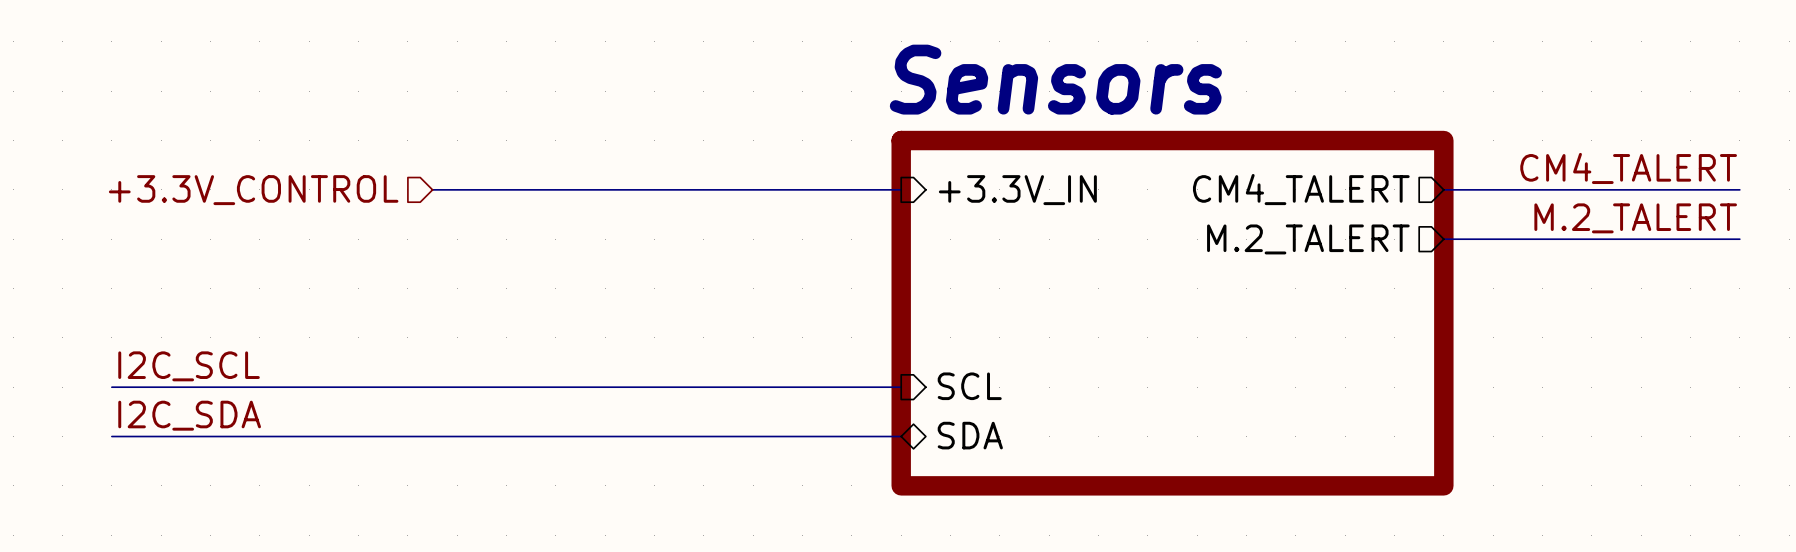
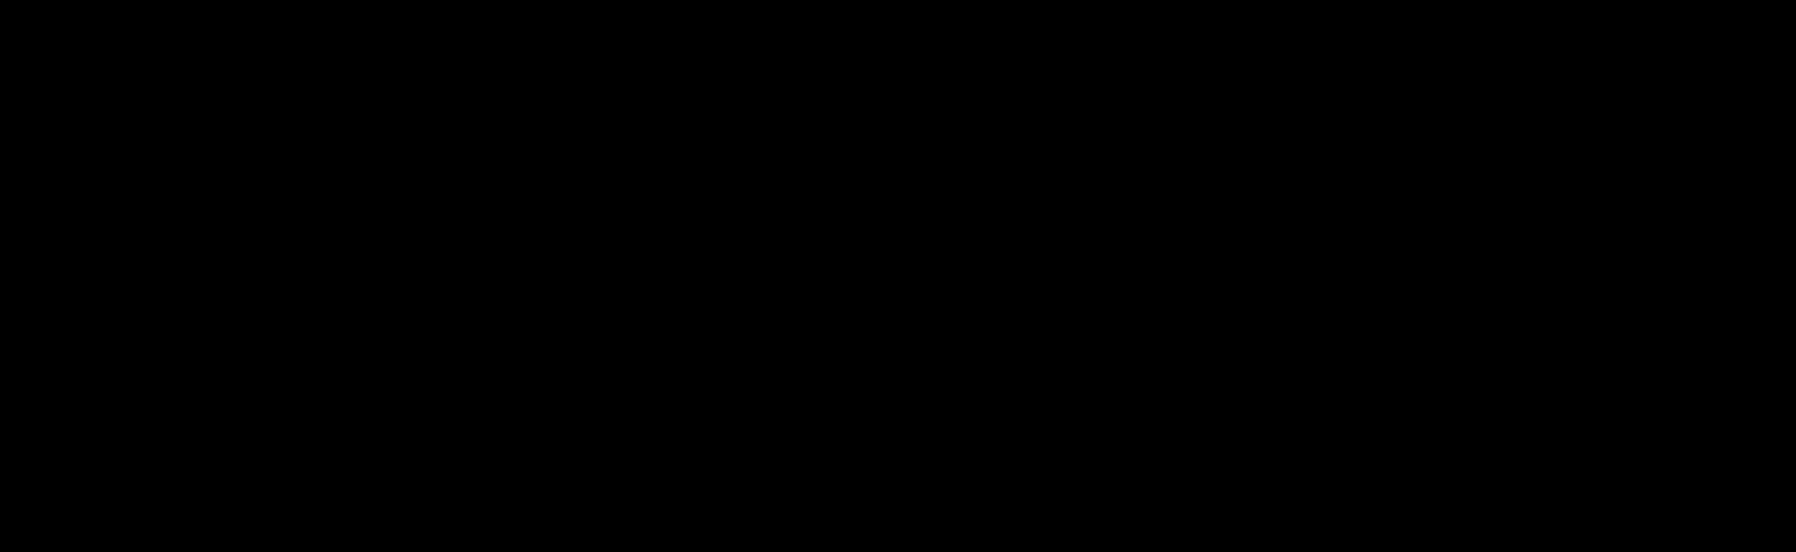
label: CM4_TALERT (1628, 168) -> none
wire: (432, 189) (901, 189) -> none
sheet pin: CM4_TALERT (1301, 189) -> none
wire: (1443, 189) (1739, 189) -> none
hierarchical label: +3.3V_CONTROL (253, 190) -> none
sheet pin: +3.3V_IN (1017, 190) -> none
label: M.2_TALERT (1635, 218) -> none
sheet pin: M.2_TALERT (1308, 239) -> none
wire: (1443, 239) (1739, 239) -> none
sheet Sensors: (1172, 313) -> none
label: I2C_SCL (189, 366) -> none
sheet pin: SCL (969, 386) -> none
wire: (111, 387) (901, 387) -> none
label: I2C_SDA (189, 415) -> none
sheet pin: SDA (970, 435) -> none
wire: (111, 436) (901, 436) -> none

